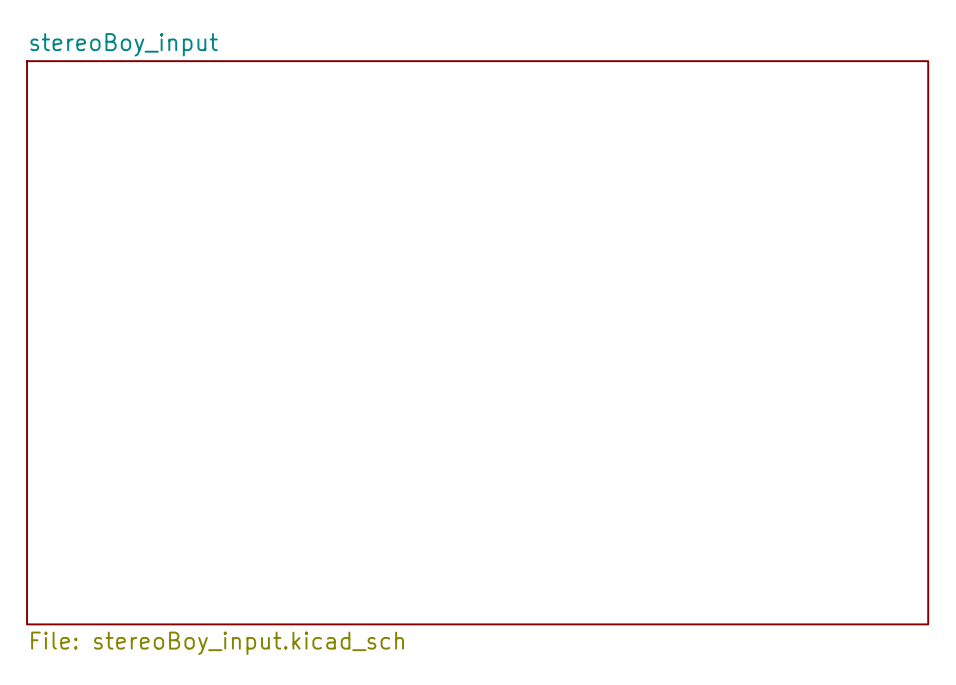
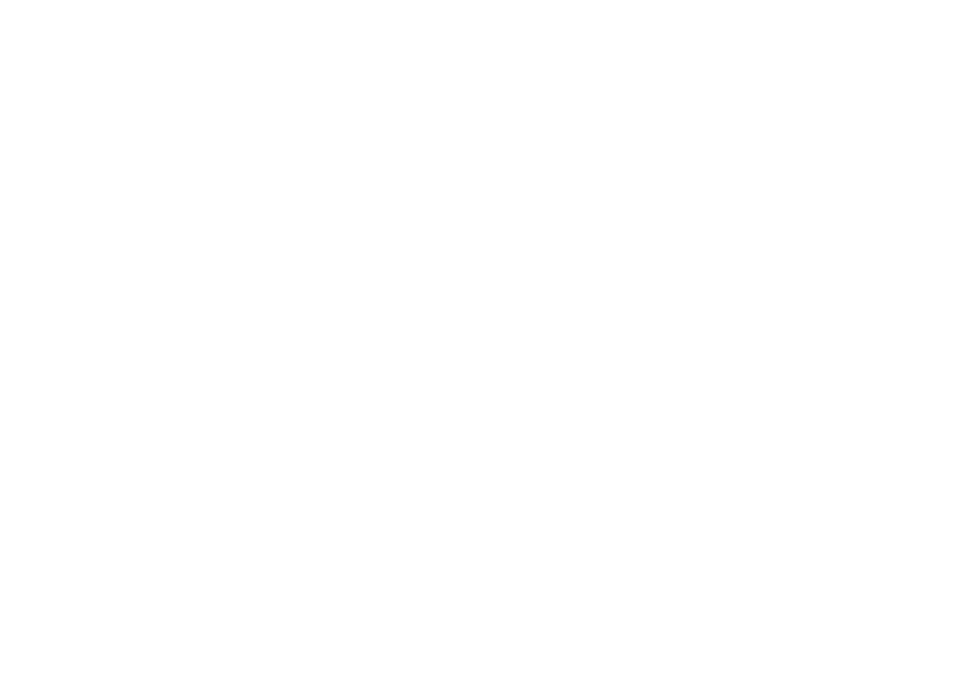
sheet stereoBoy_input: File: stereoBoy_input.kicad_sch (477, 342) -> none

